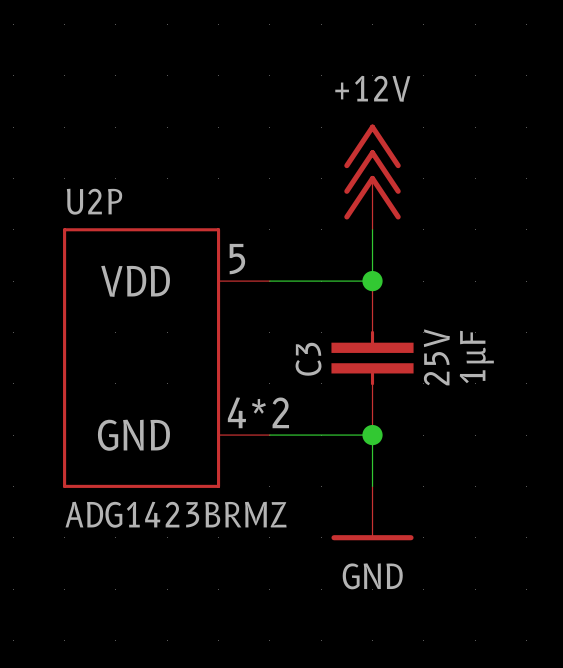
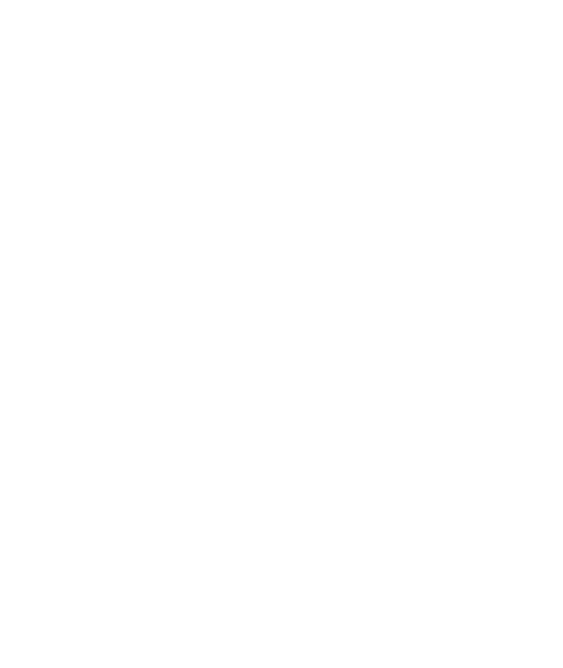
power symbol: +12V (372, 177) -> none
wire: (372, 229) (372, 281) (269, 281) -> none
junction: (372, 281) -> none
U2P: (166, 358) -> none
C3: (372, 358) -> none
wire: (269, 435) (372, 435) (372, 486) -> none
junction: (372, 435) -> none
power symbol: GND (372, 513) -> none

